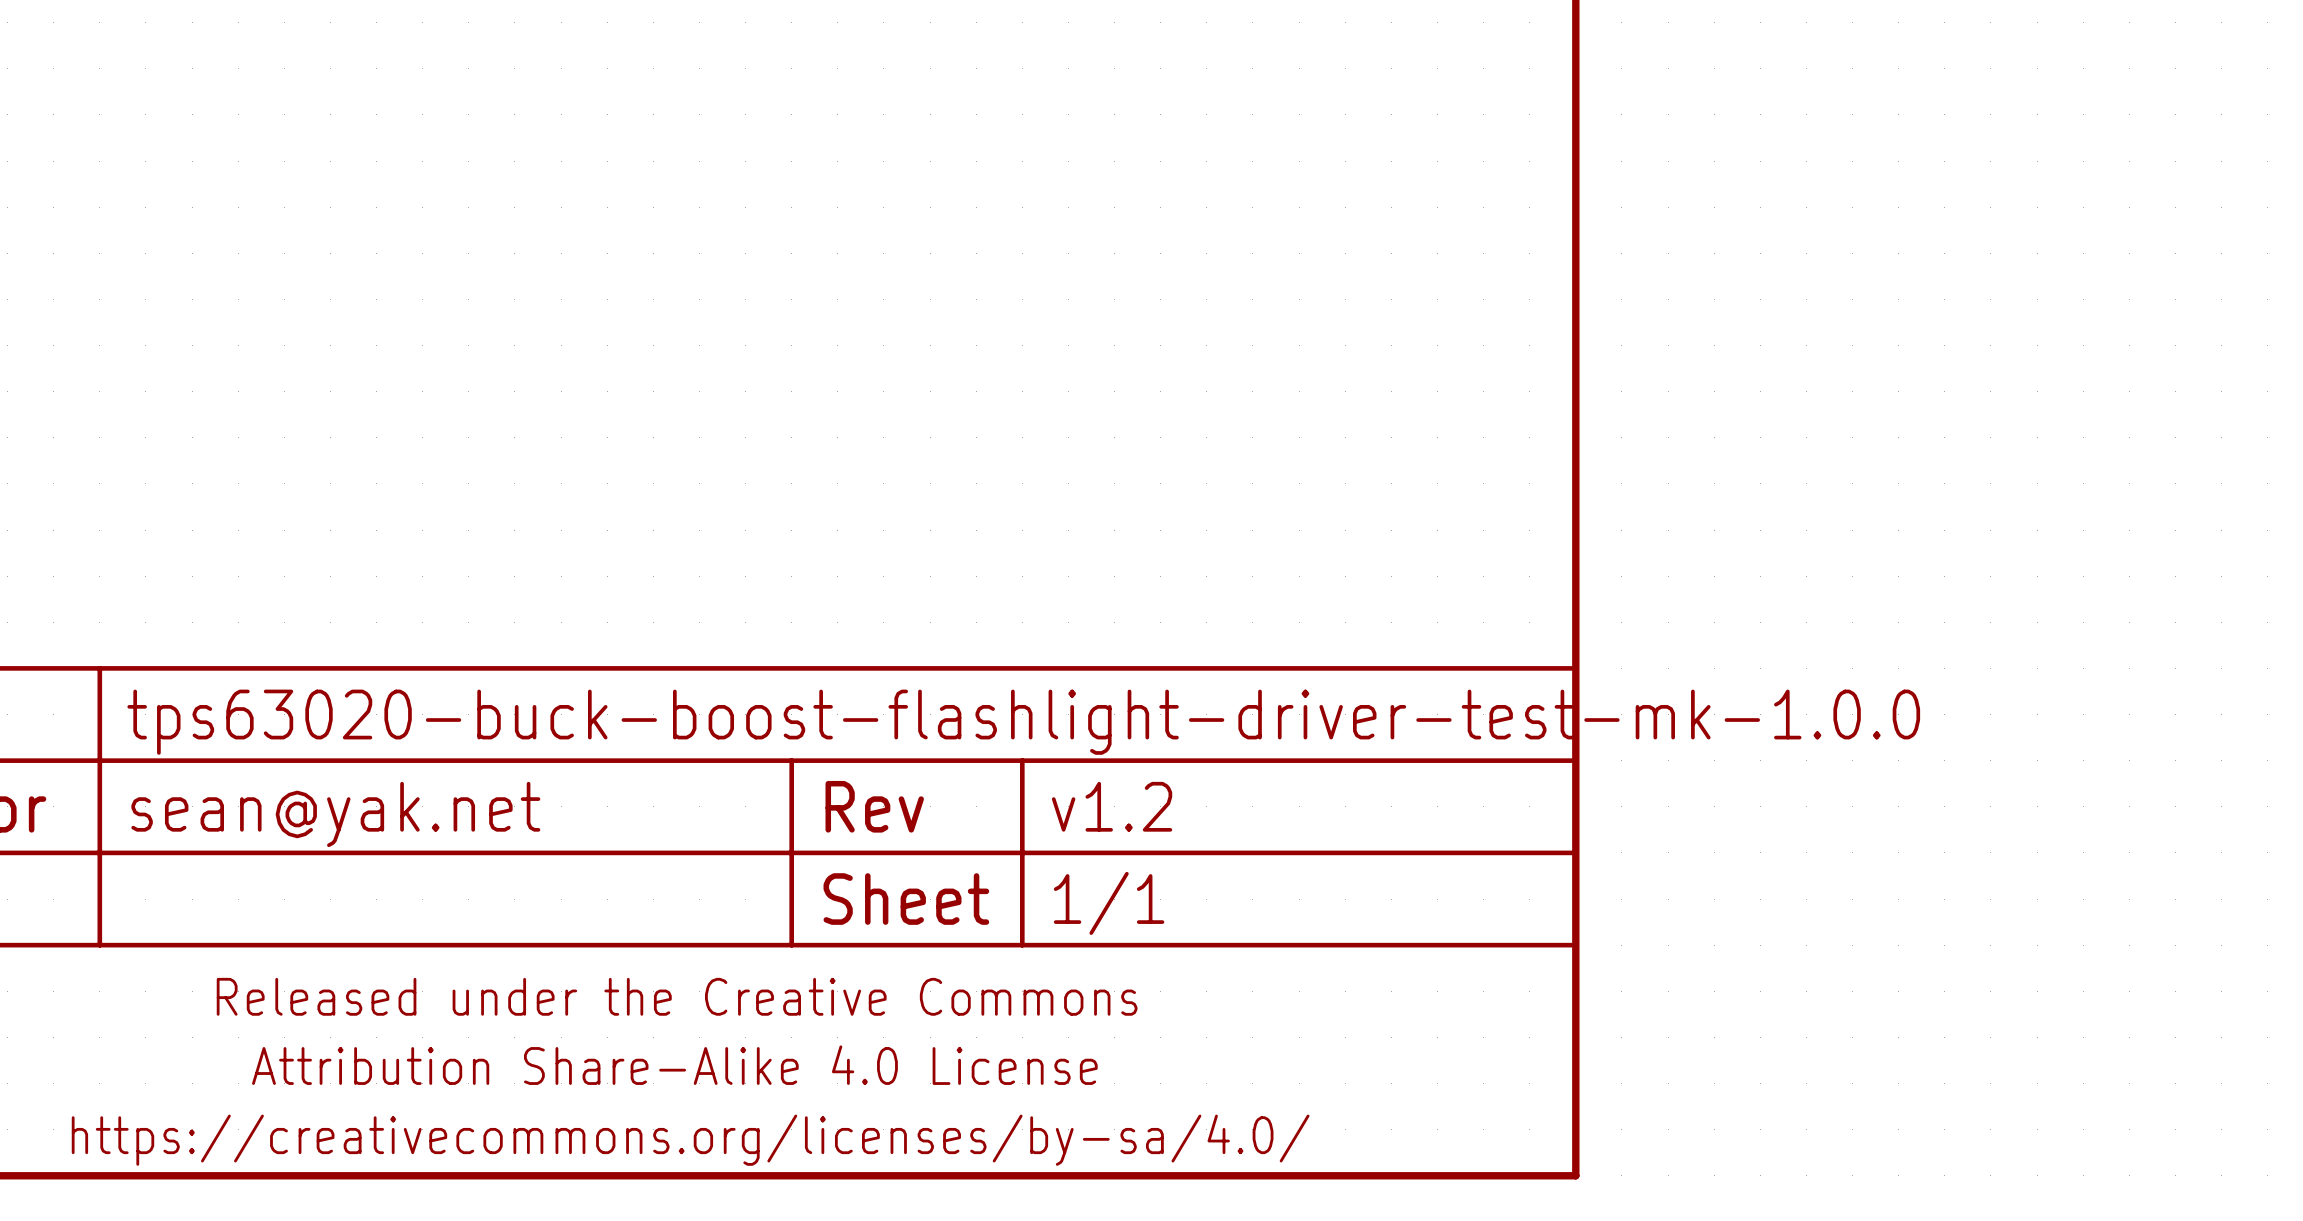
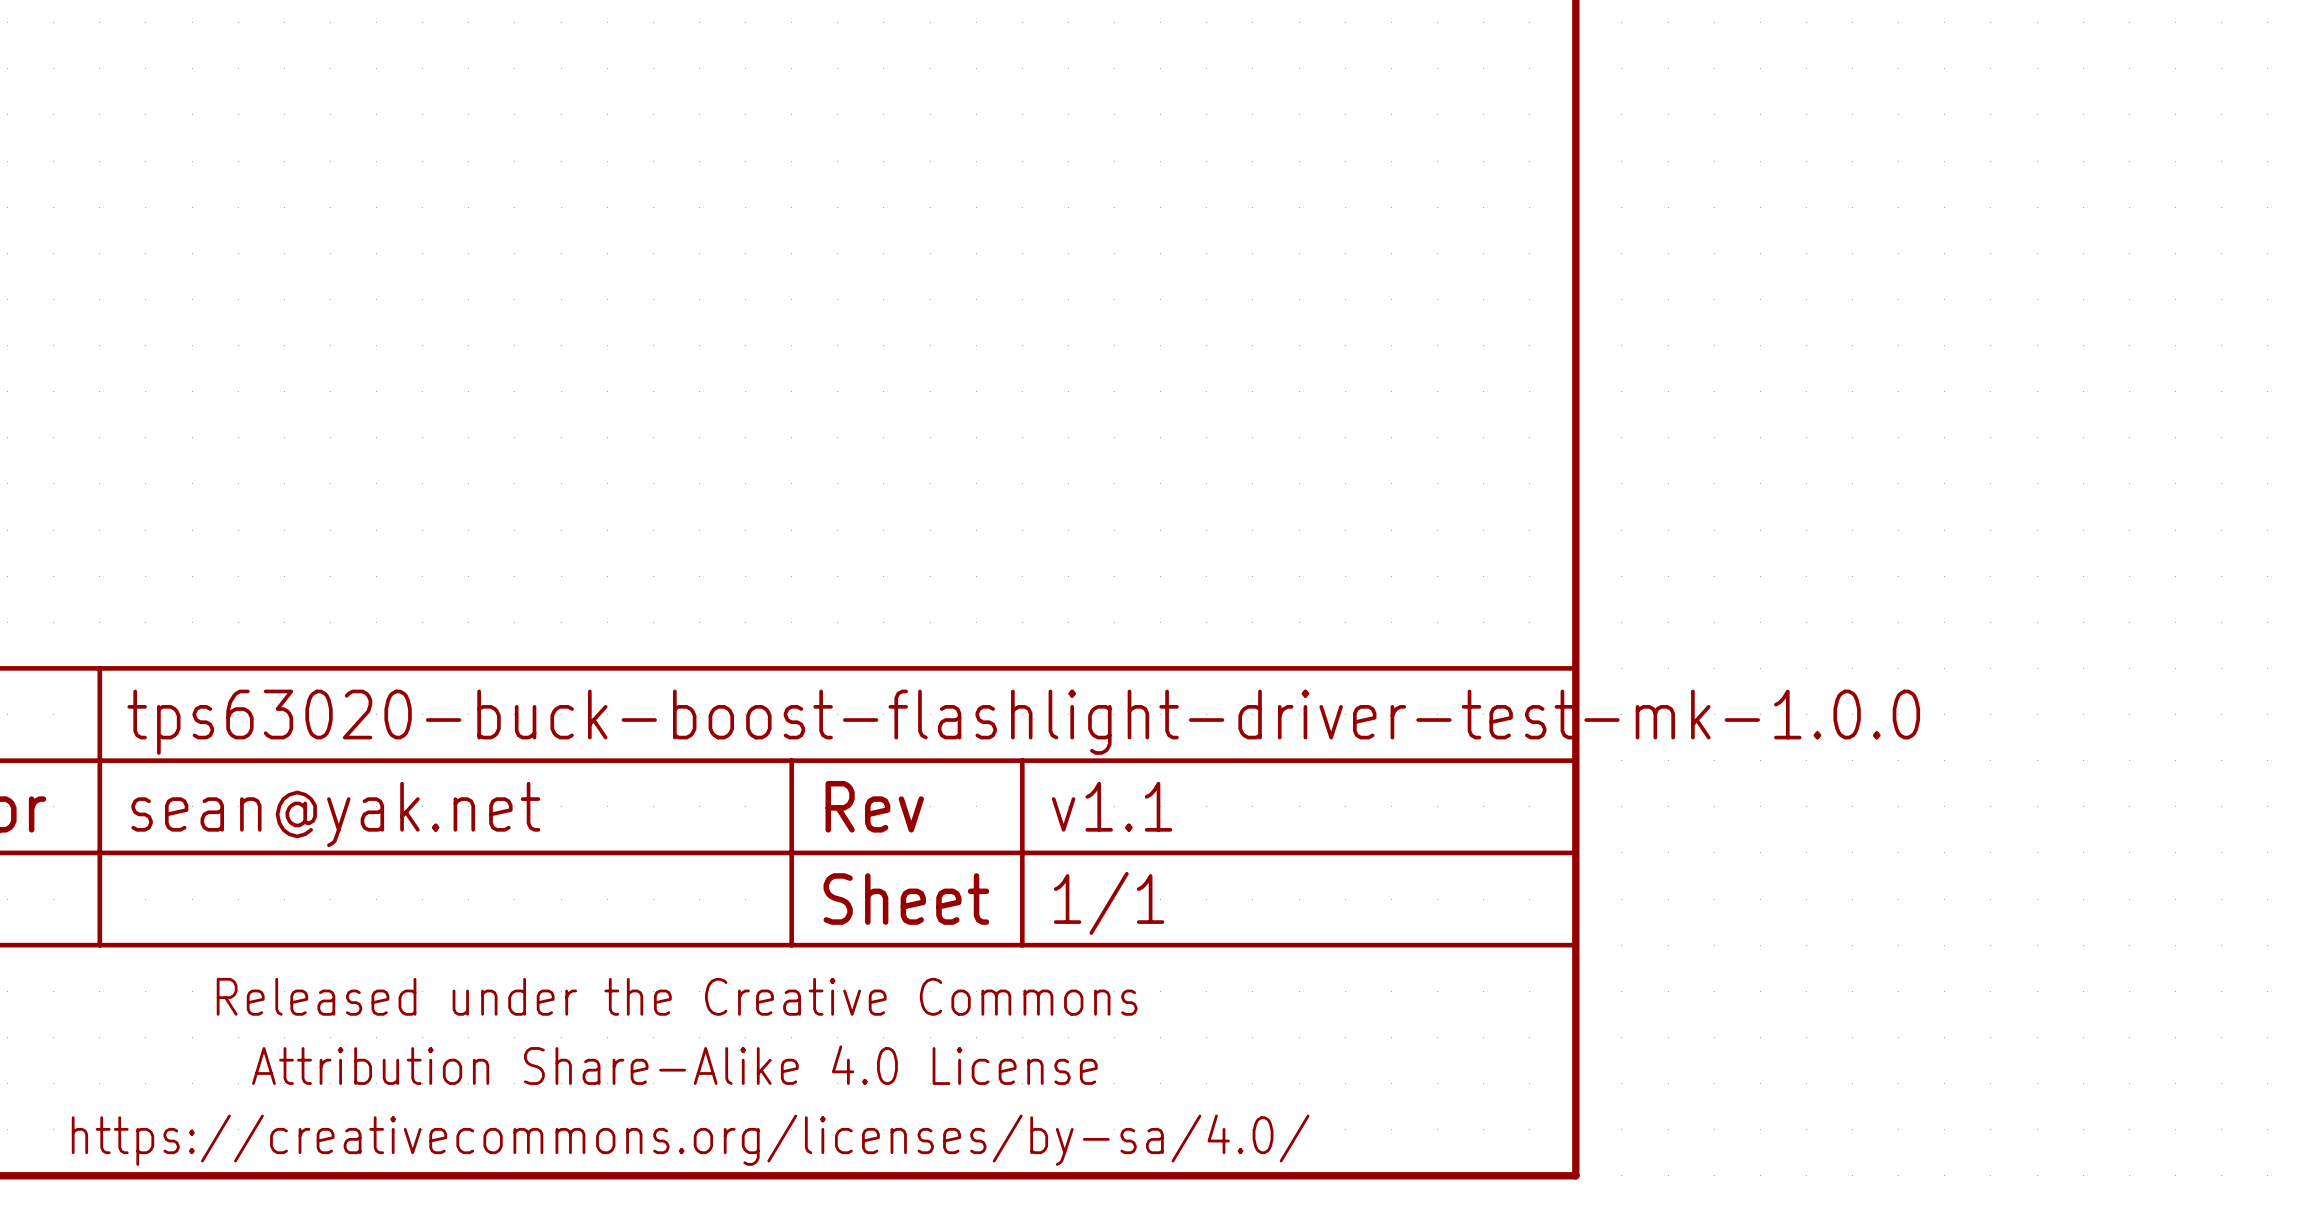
part text: v1.2 (1112, 806) -> v1.1 (1112, 806)

